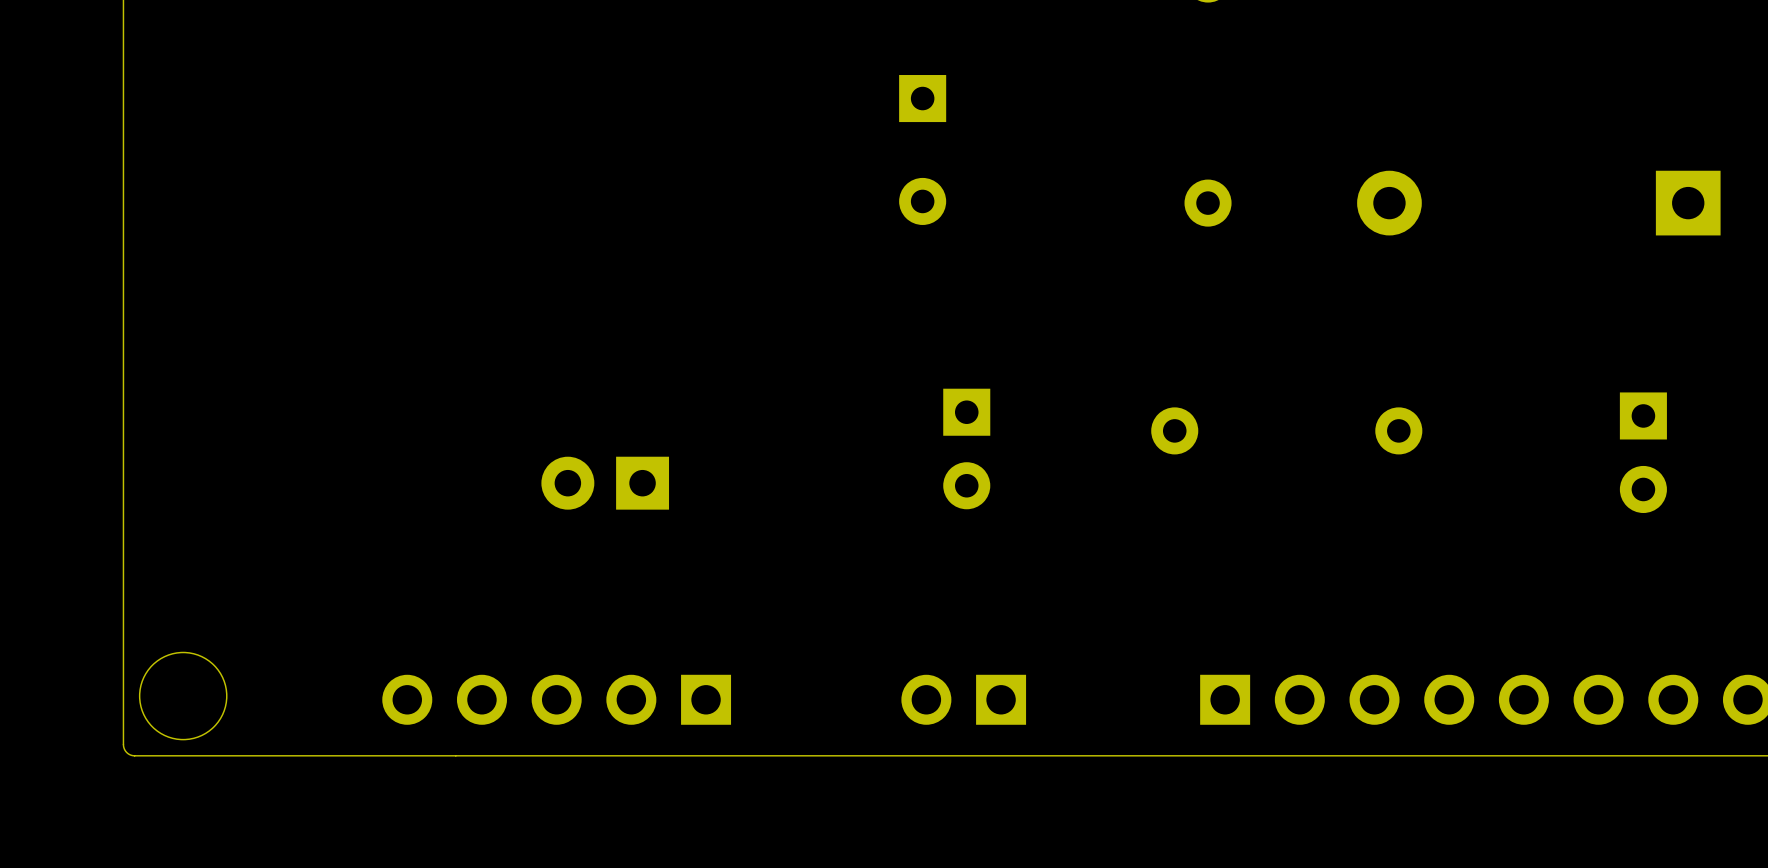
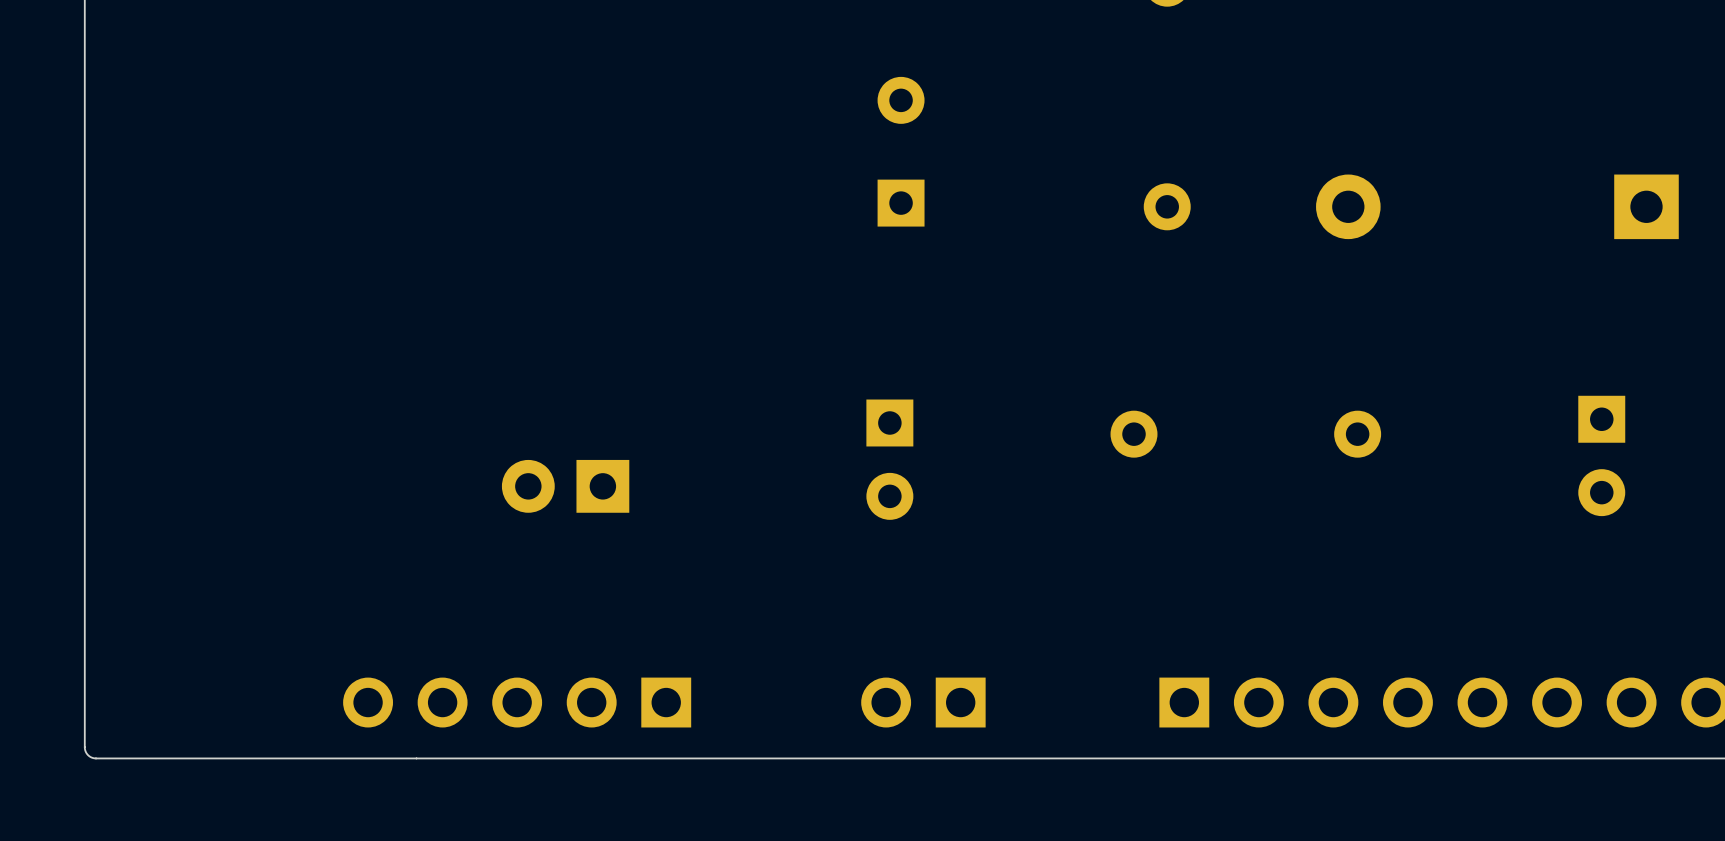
part rotation: 0° (922, 149) -> 180° (901, 151)
part position: (966, 448) -> (889, 459)
round board edge: [138, 651, 228, 741] -> none

